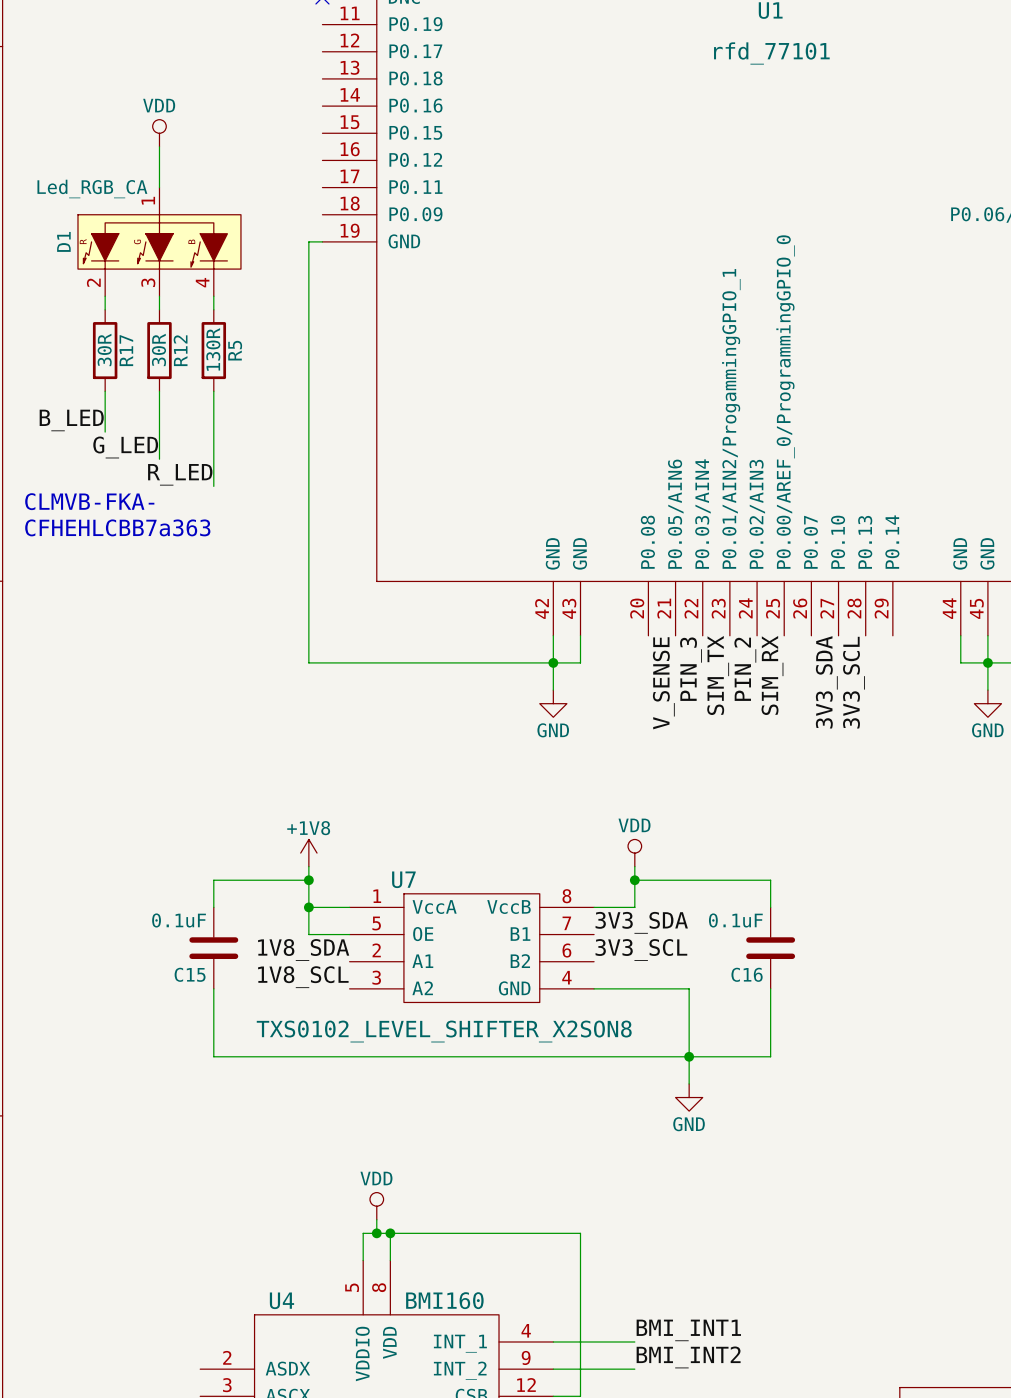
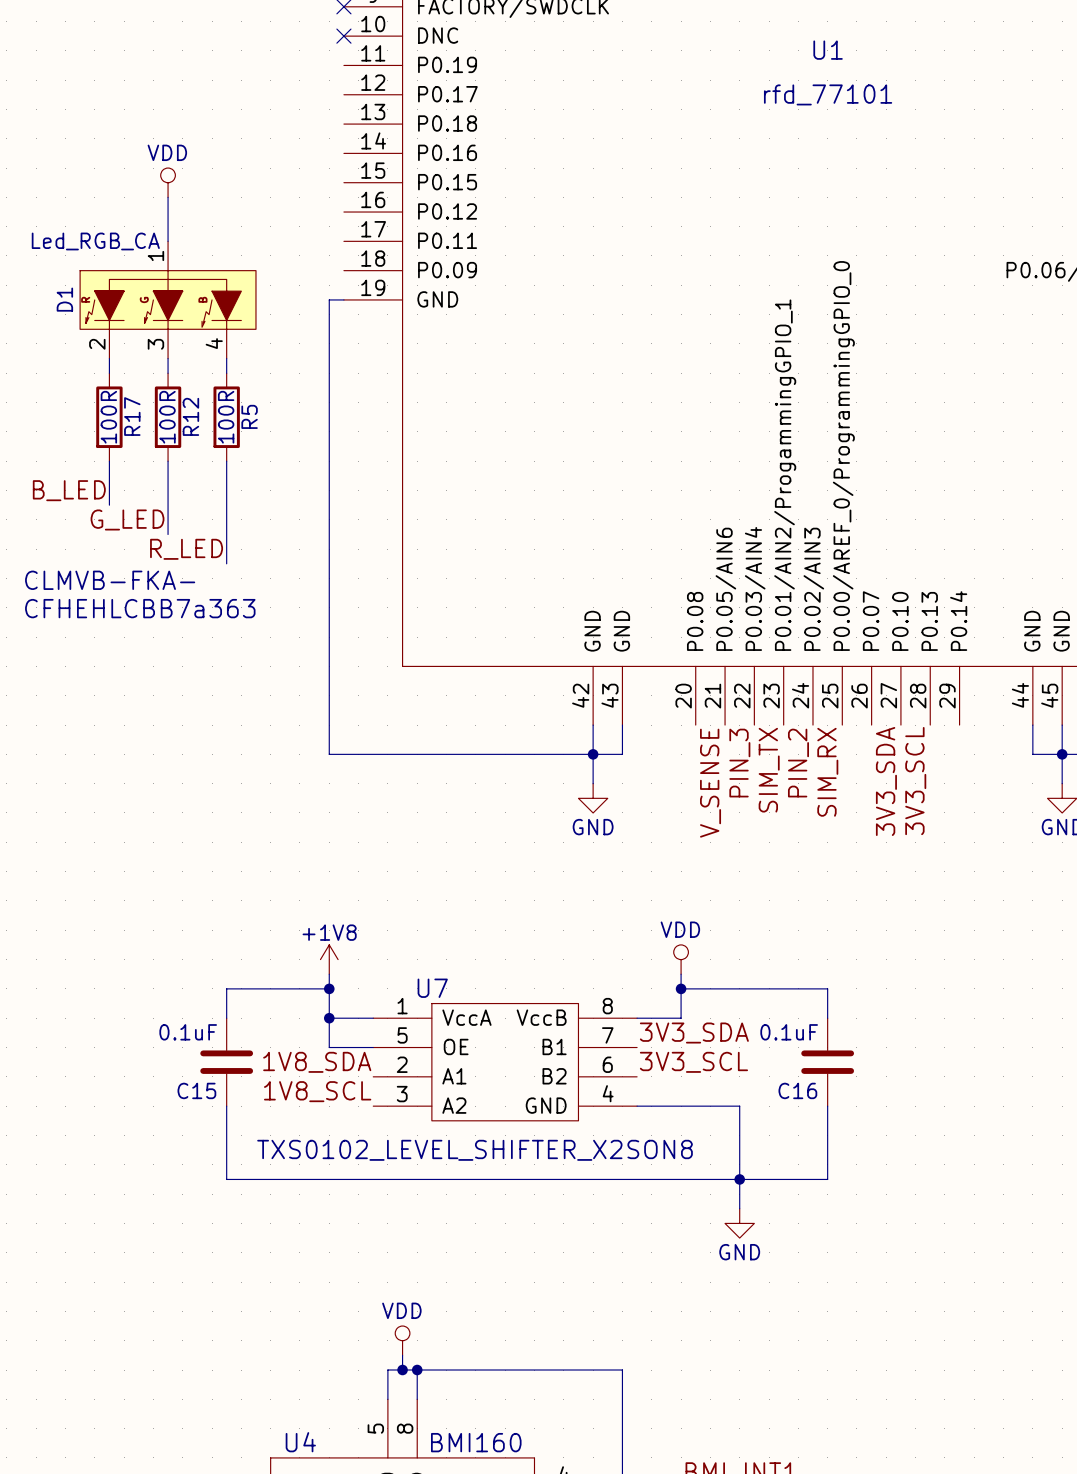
R17 value: 30R (104, 349) -> 100R (108, 417)
R12 value: 30R (158, 349) -> 100R (167, 417)
R5 value: 130R (213, 349) -> 100R (226, 417)

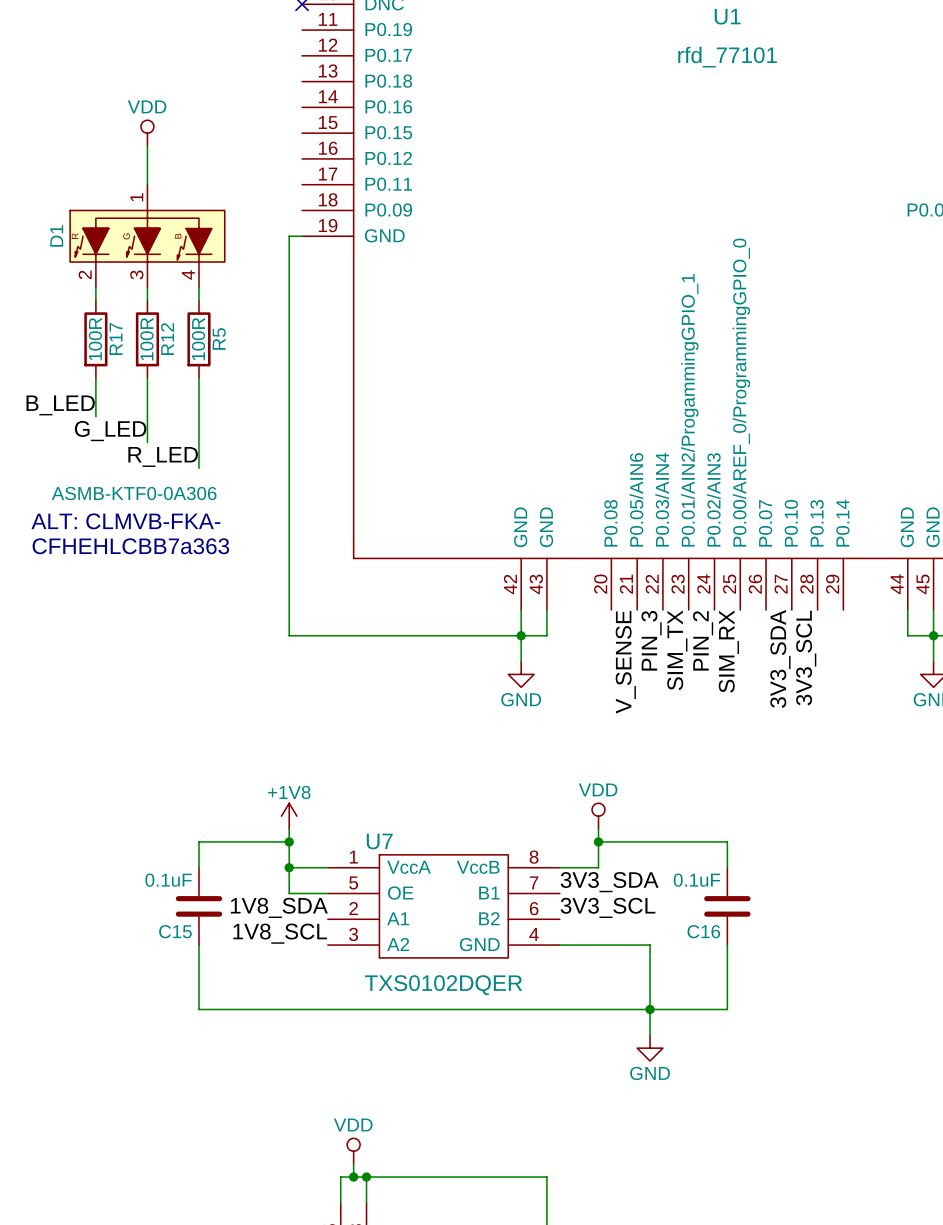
D1 value: Led_RGB_CA (95, 241) -> ASMB-KTF0-0A306 (134, 493)
text: CLMVB-FKA- (110, 580) -> none
text position: CFHEHLCBB7a363 (140, 608) -> CFHEHLCBB7a363 (130, 546)
text: none -> ALT: CLMVB-FKA- (125, 521)
U7 value: TXS0102_LEVEL_SHIFTER_X2SON8 (475, 1150) -> TXS0102DQER (443, 985)

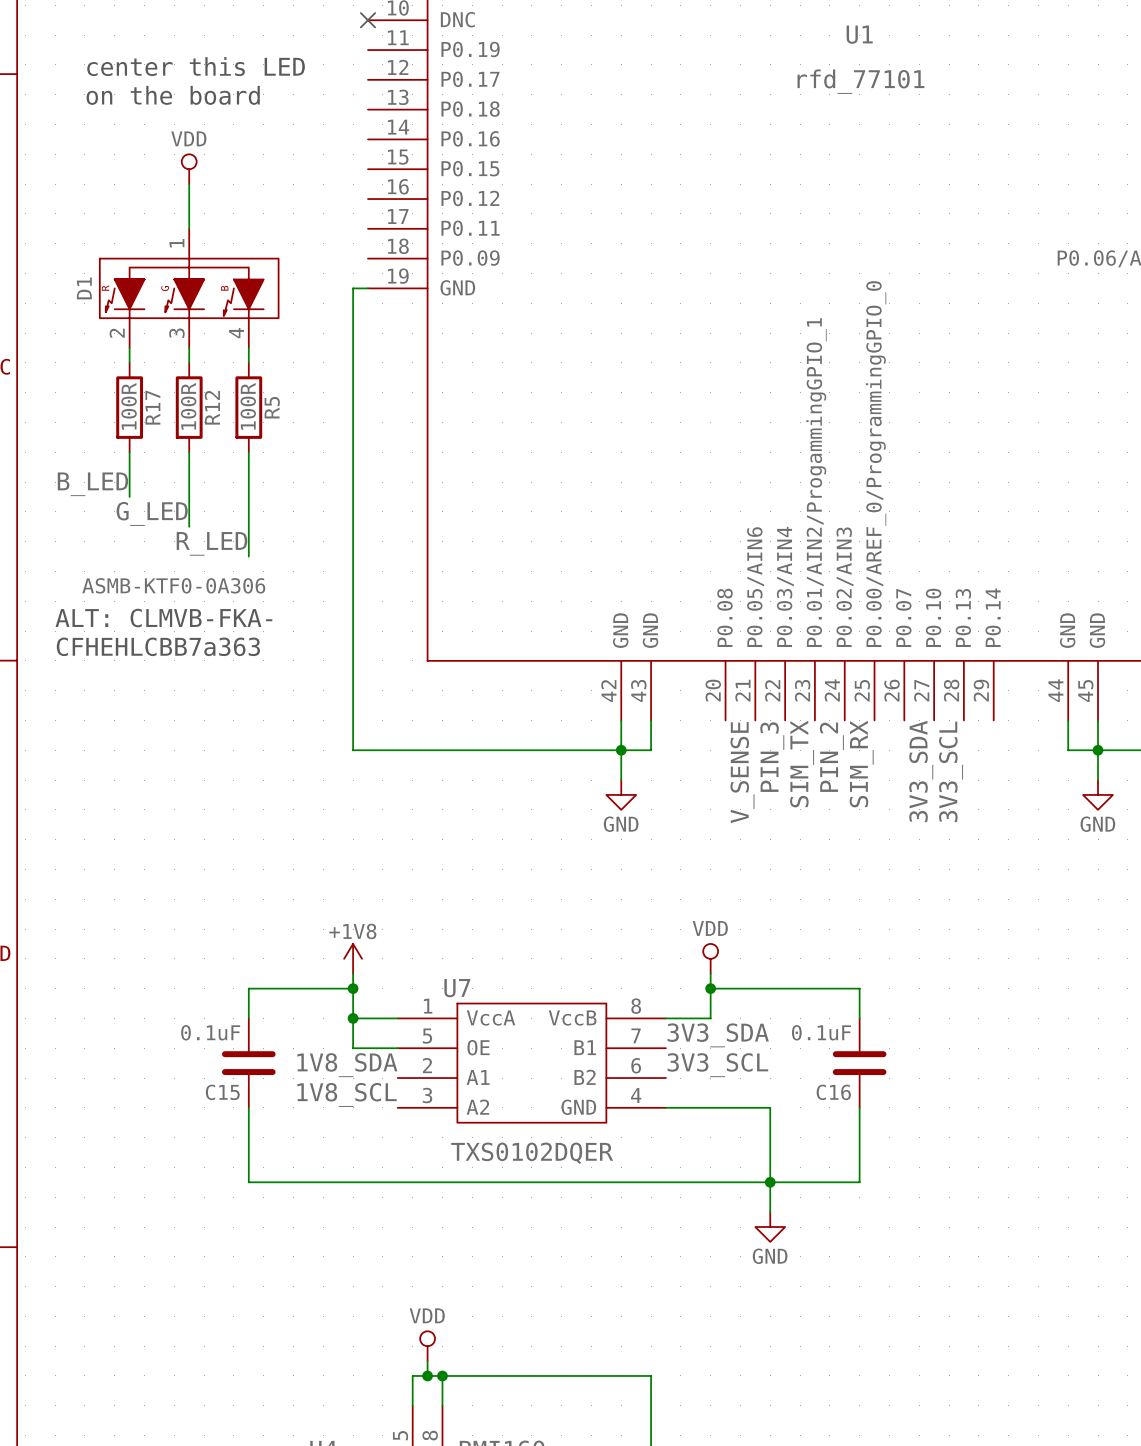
text: none -> center this LED (196, 66)
text: none -> on the board (173, 95)

